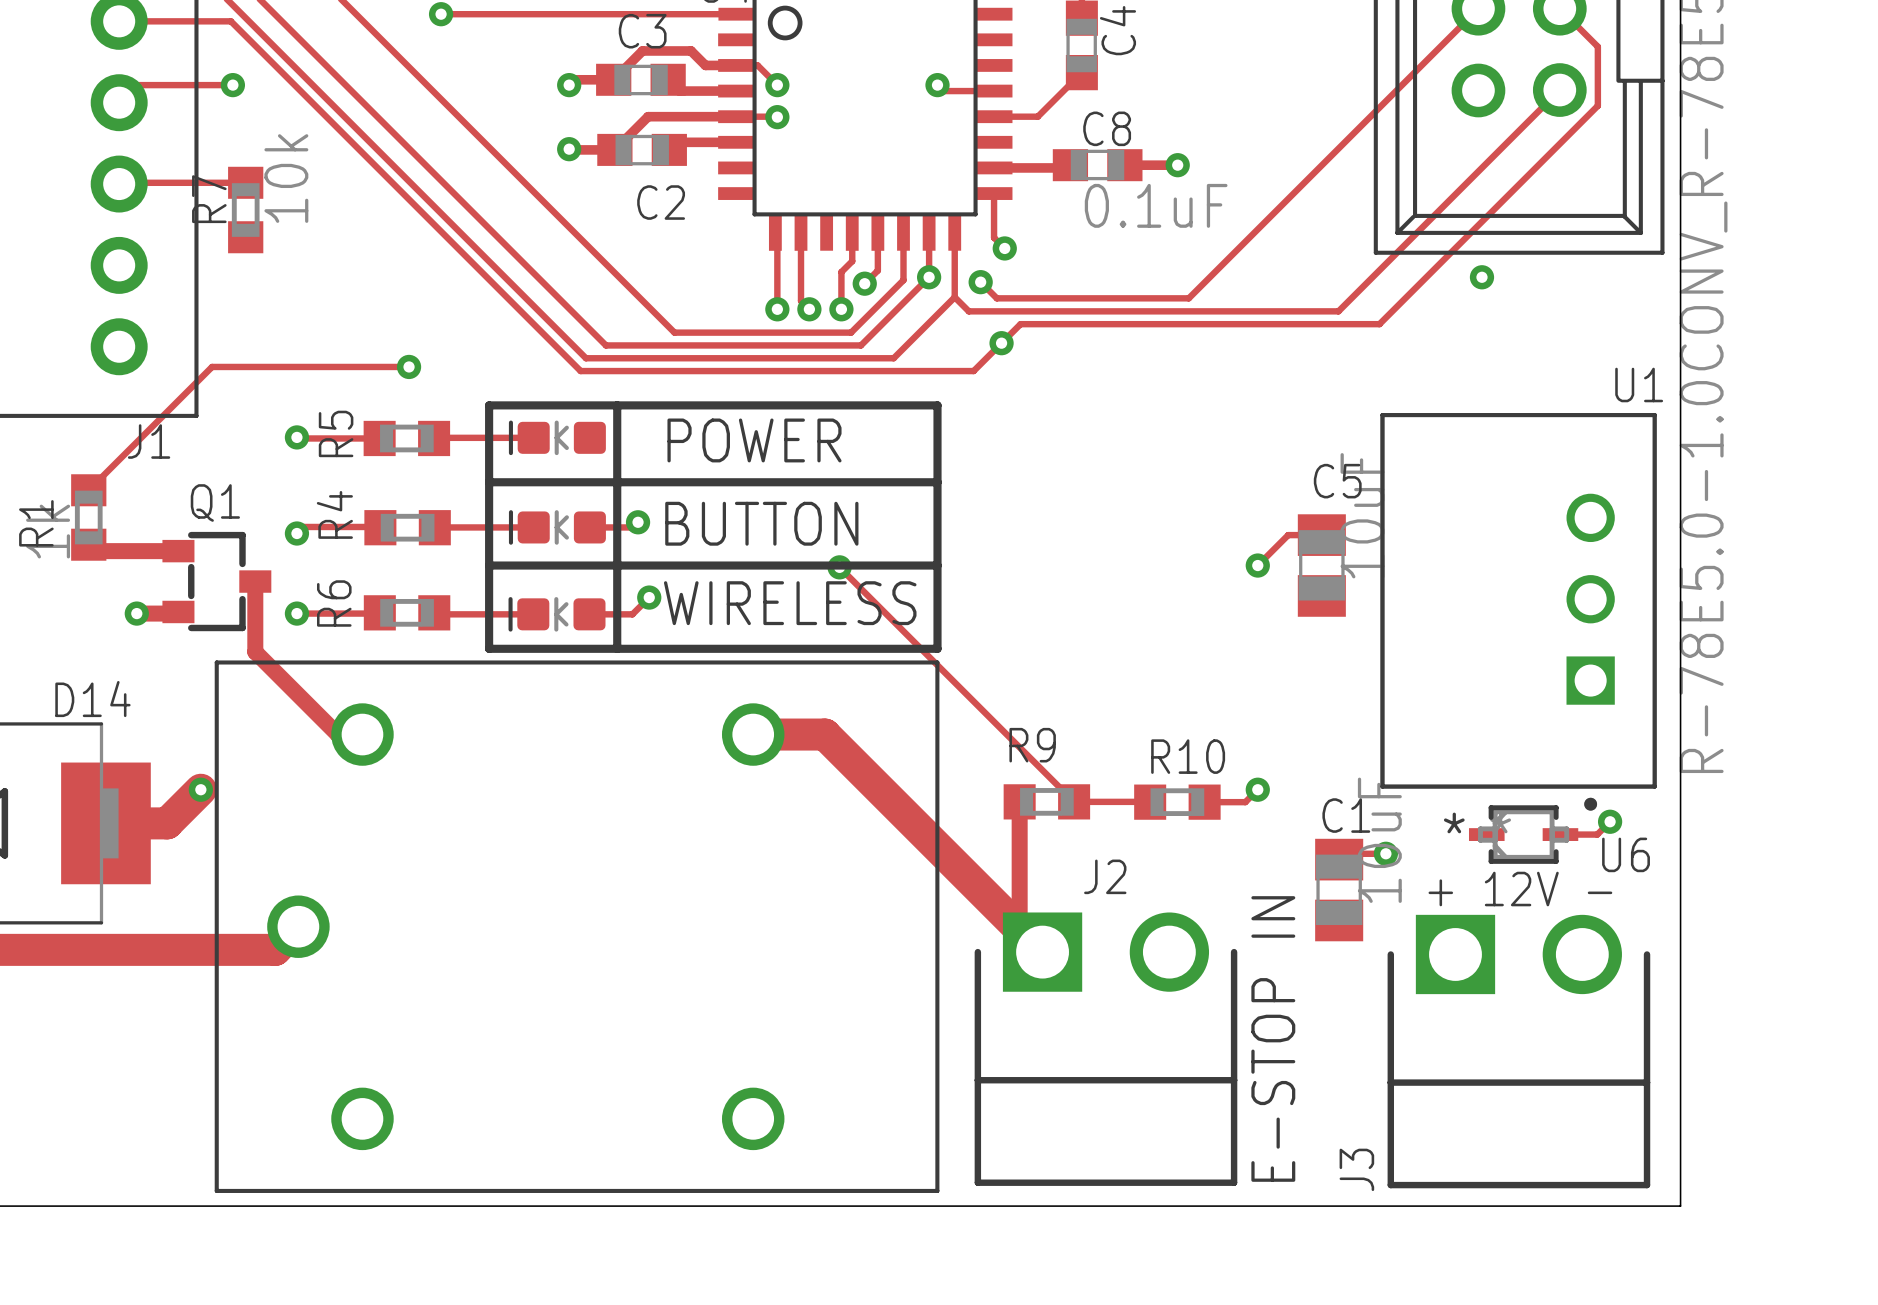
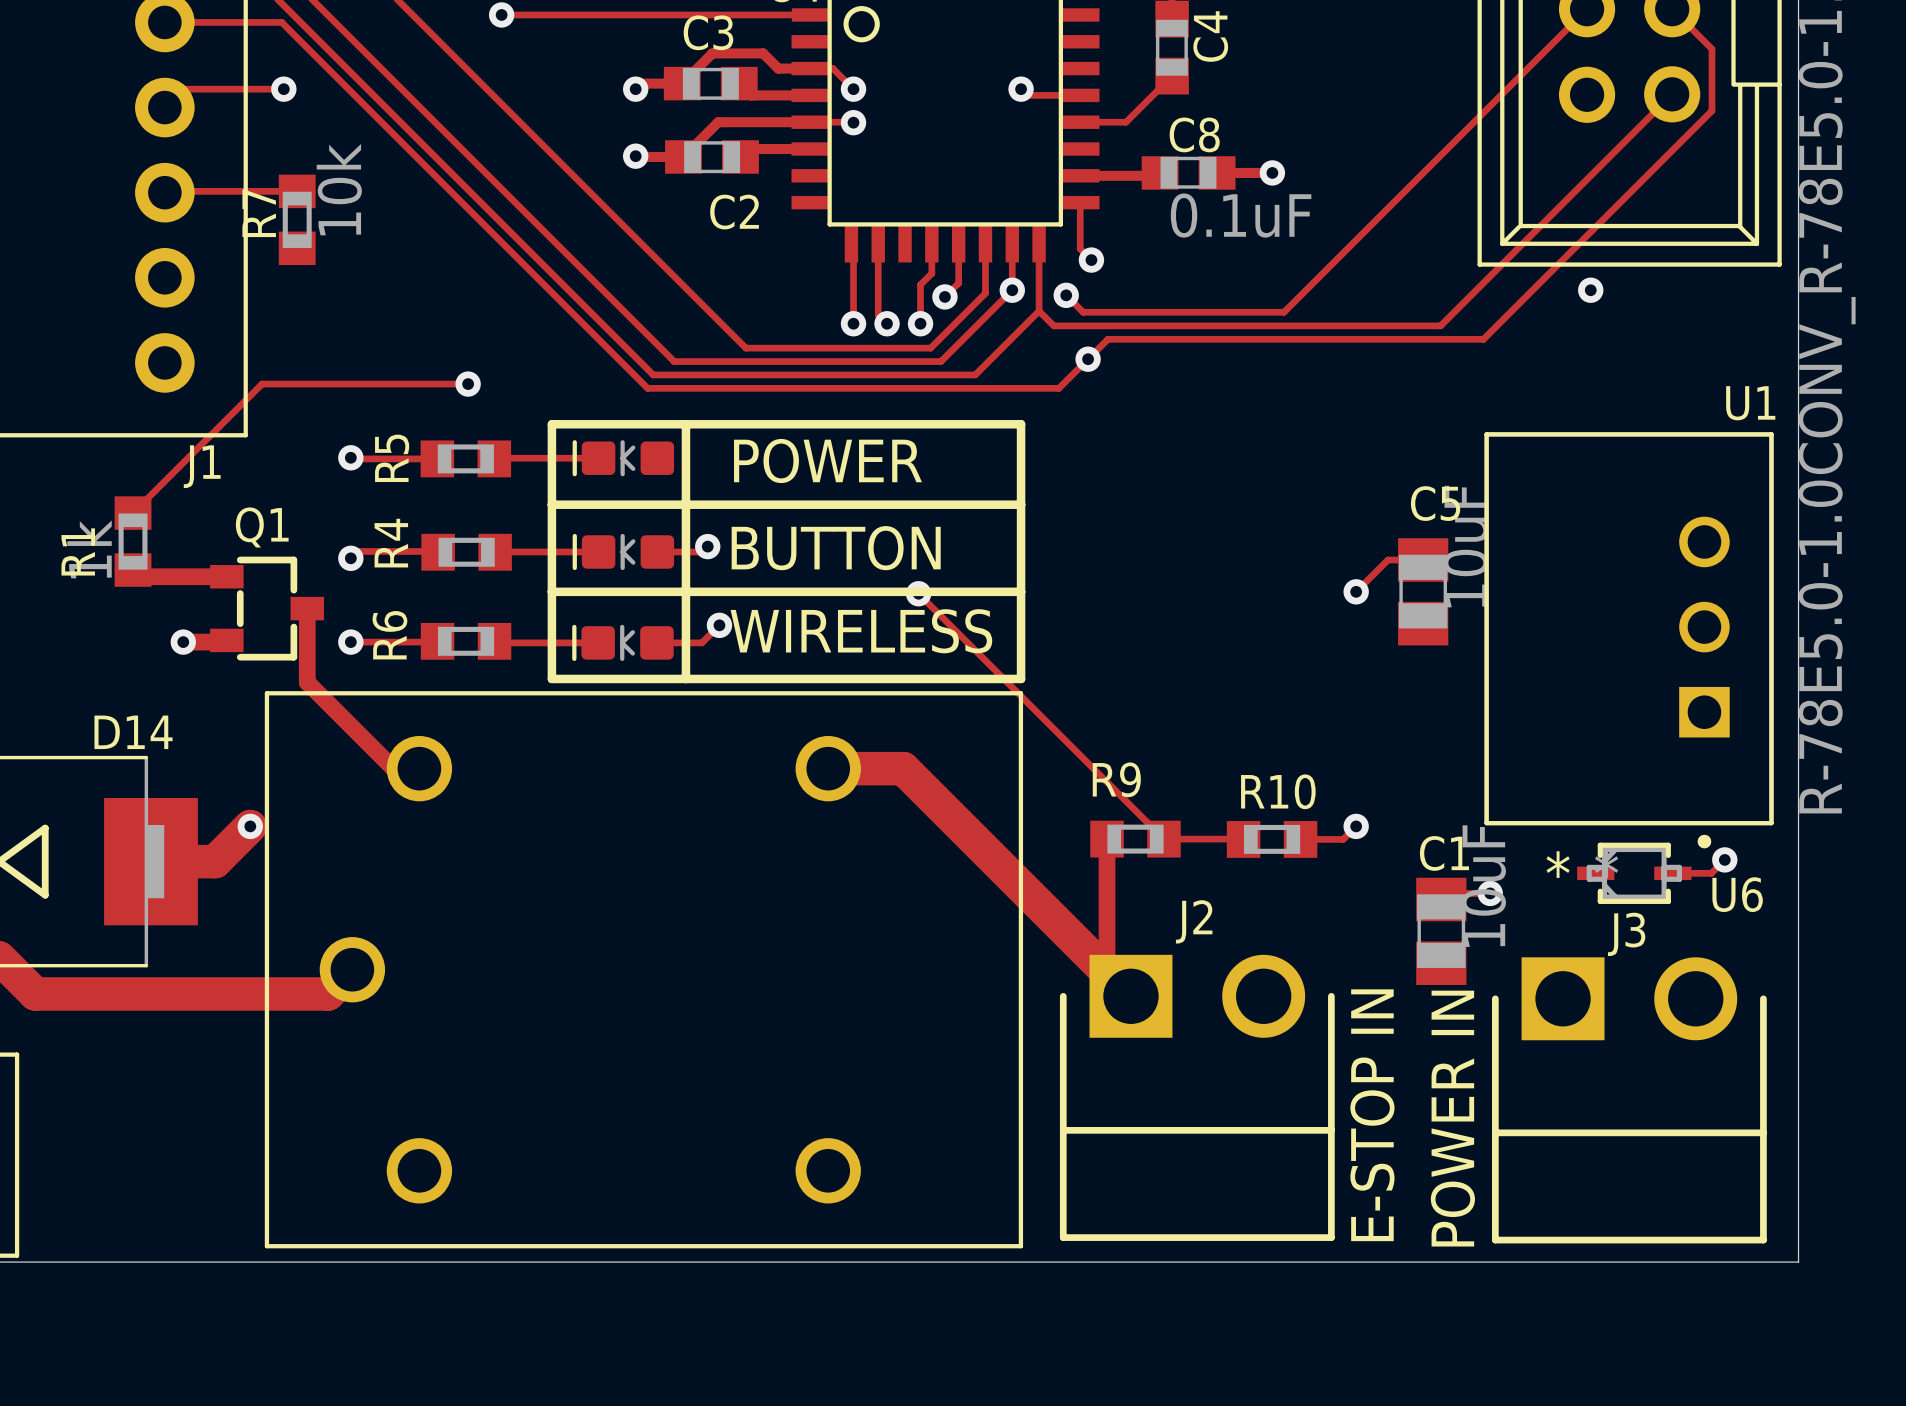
text: + 12V - (1520, 889) -> none
text: none -> POWER IN (1452, 1118)
J3 name rotation: 0° (1356, 1169) -> 90° clockwise (1626, 934)
J3 name position: J3 (1356, 1169) -> J3 (1626, 934)

